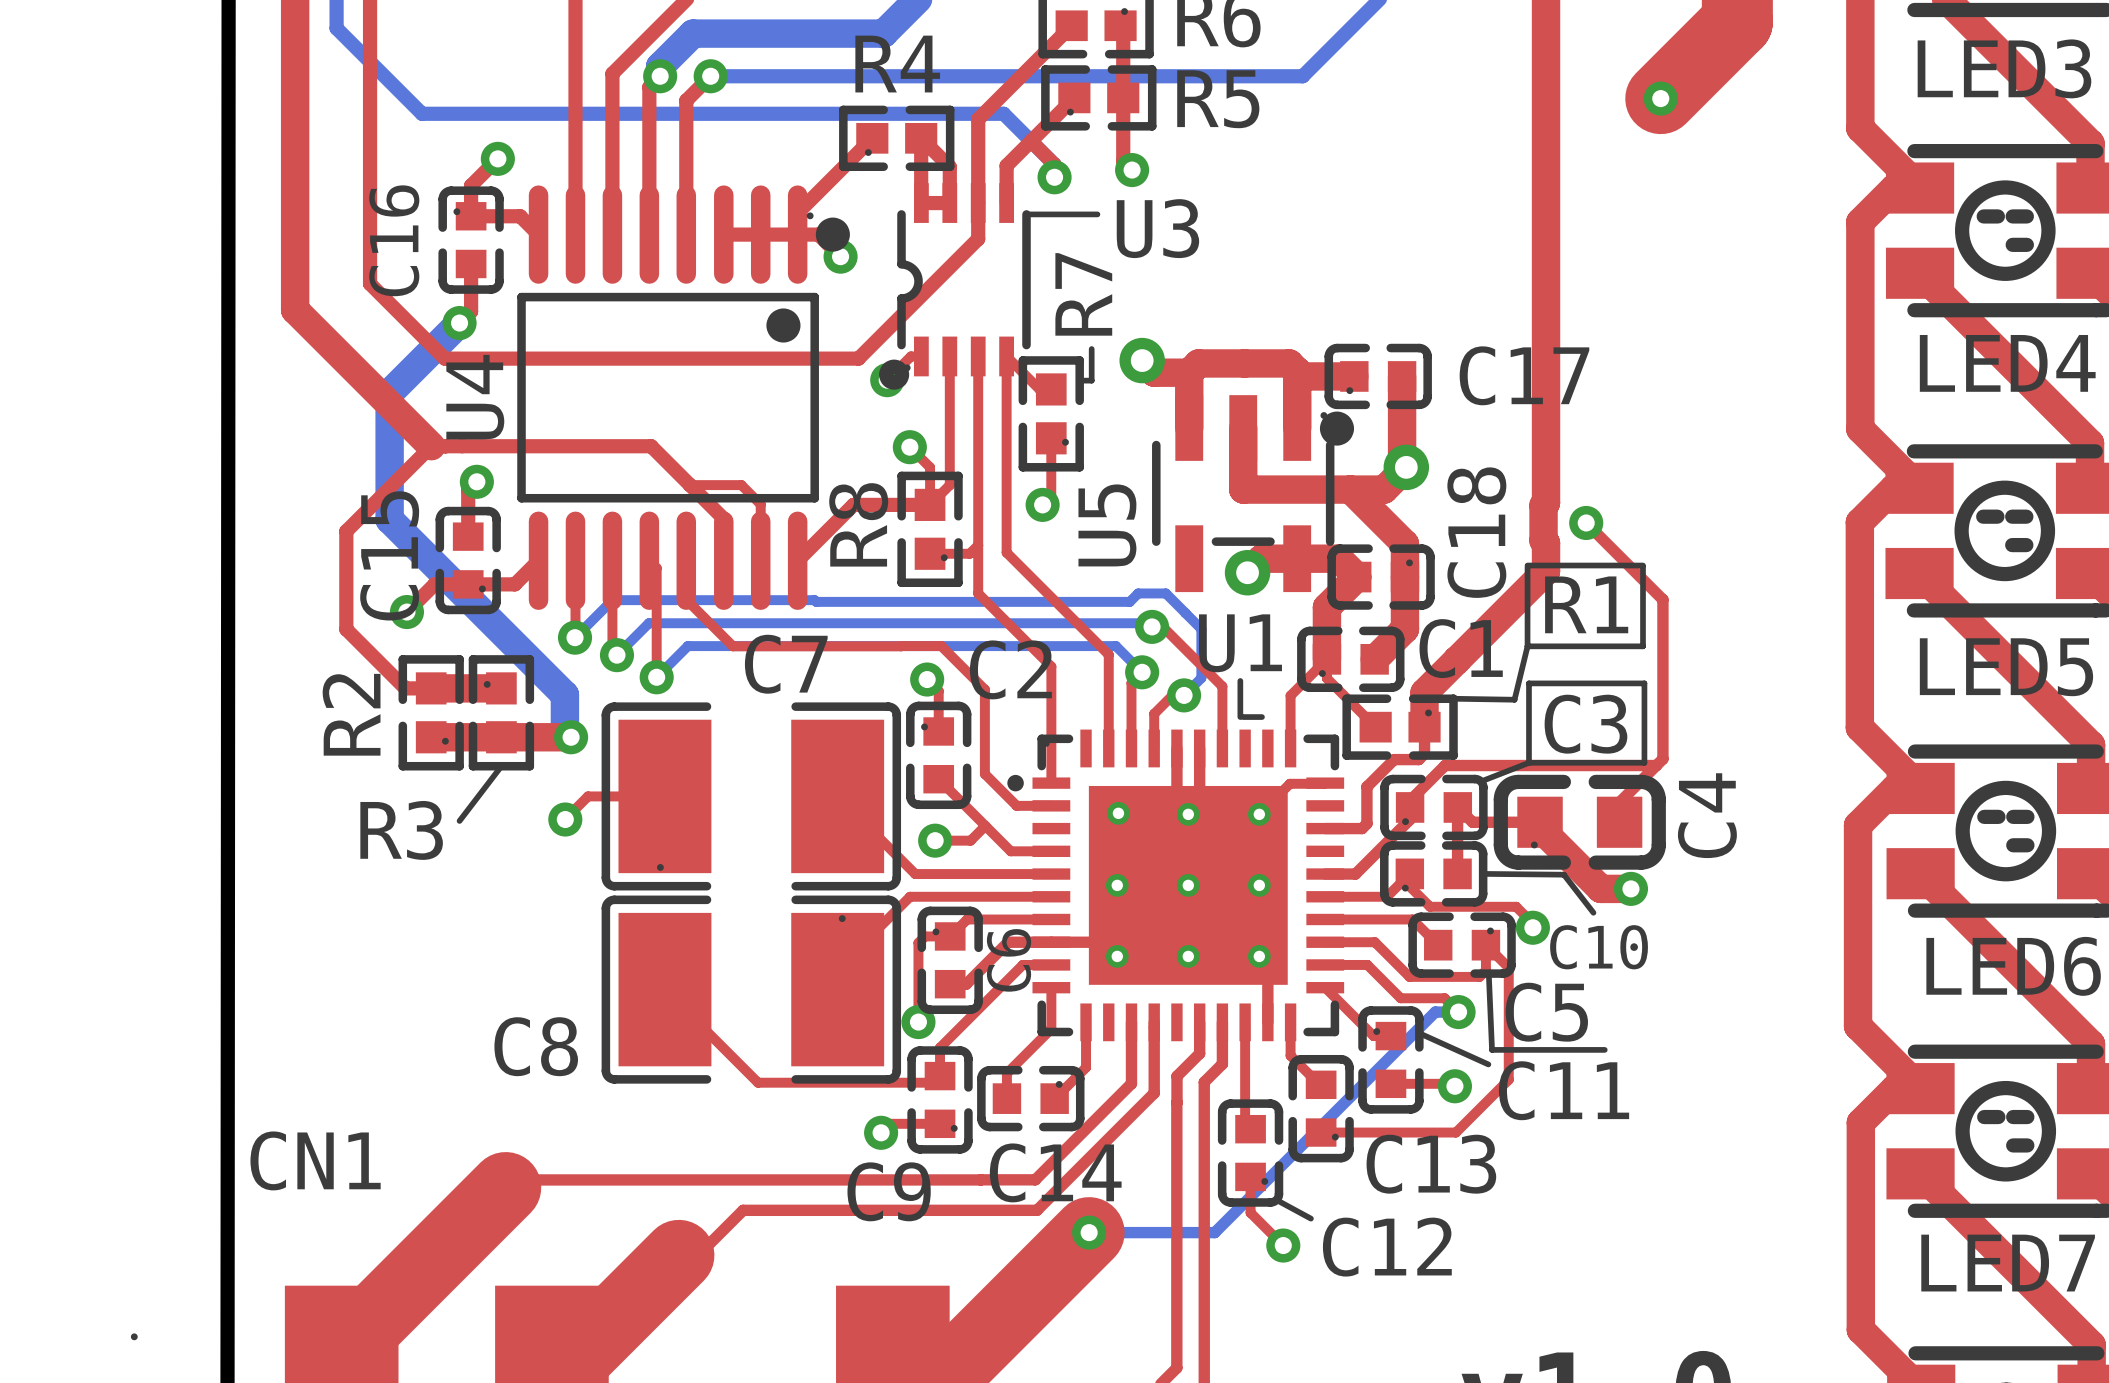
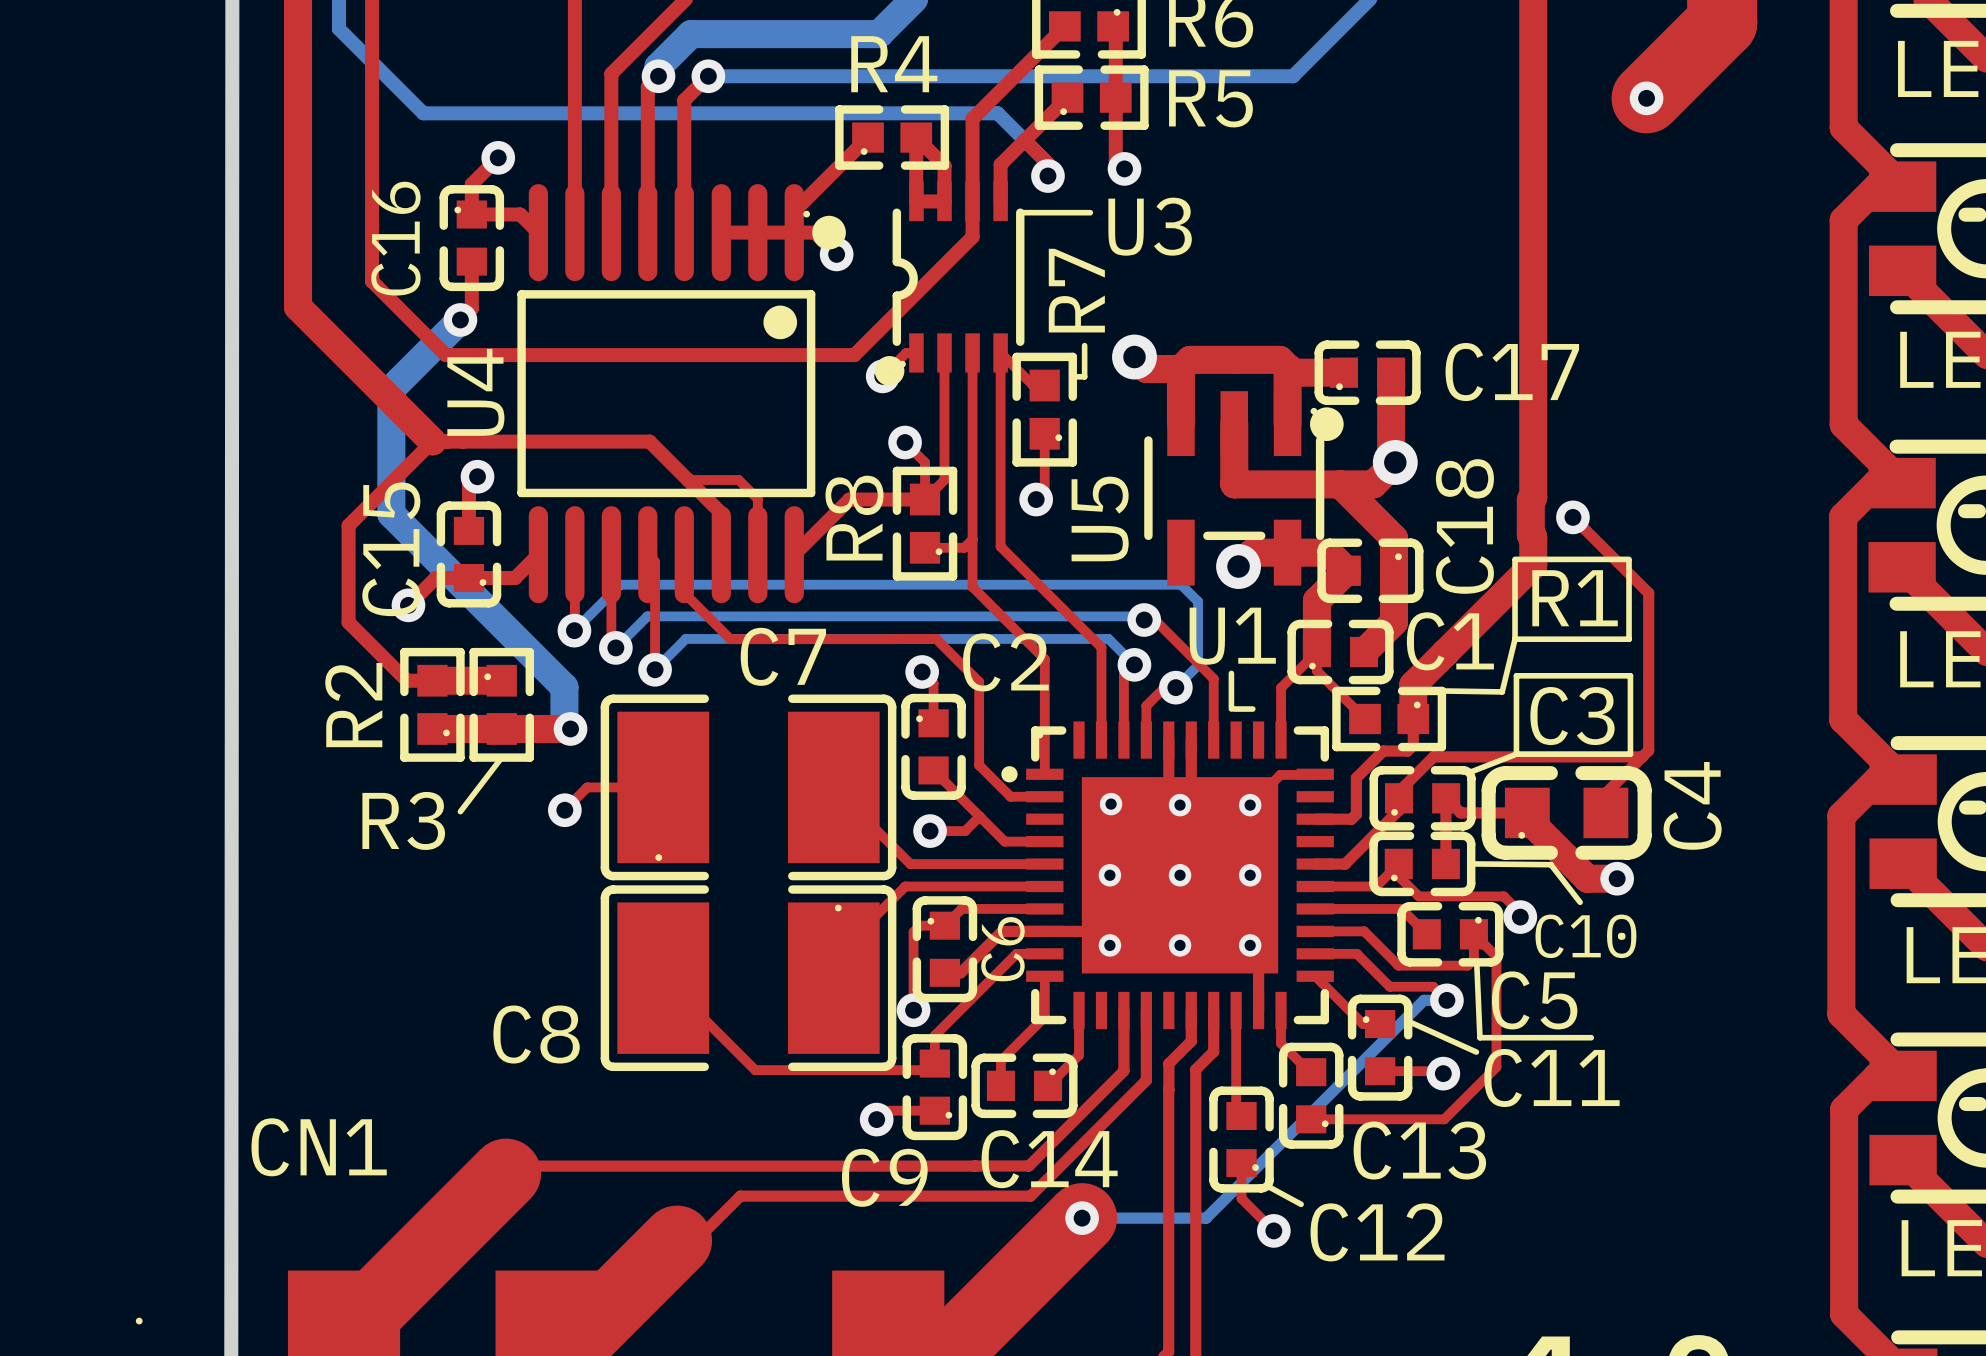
bottom track: (612, 600) (1129, 601) (1138, 593) (1165, 593) (1201, 629) (1201, 678) -> (611, 593) (620, 584) (1181, 584) (1198, 601) (1198, 665) (1192, 670)

